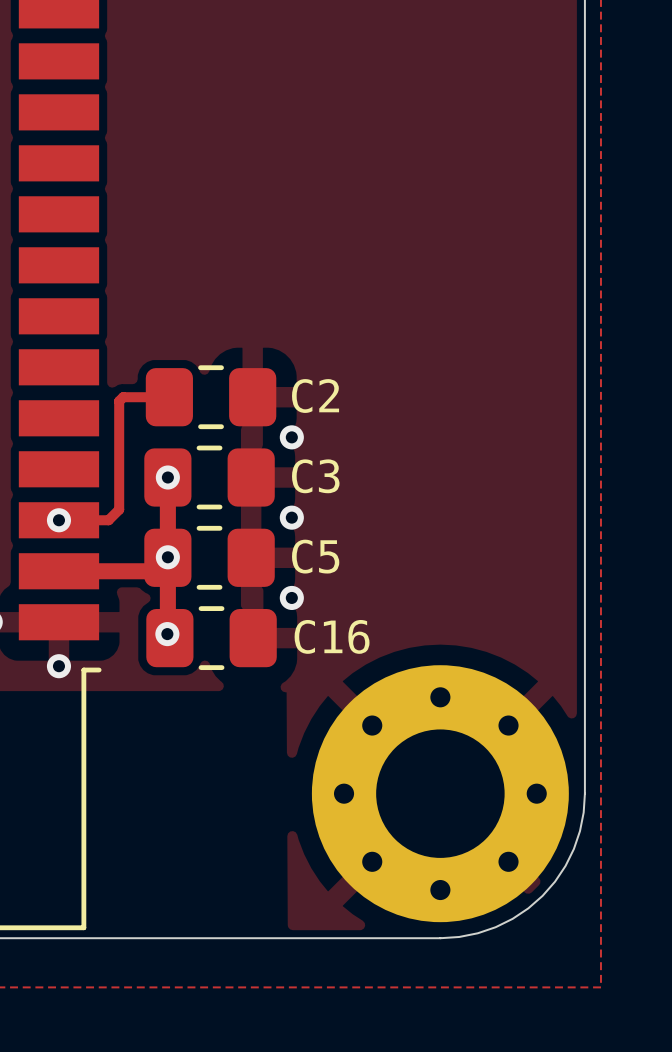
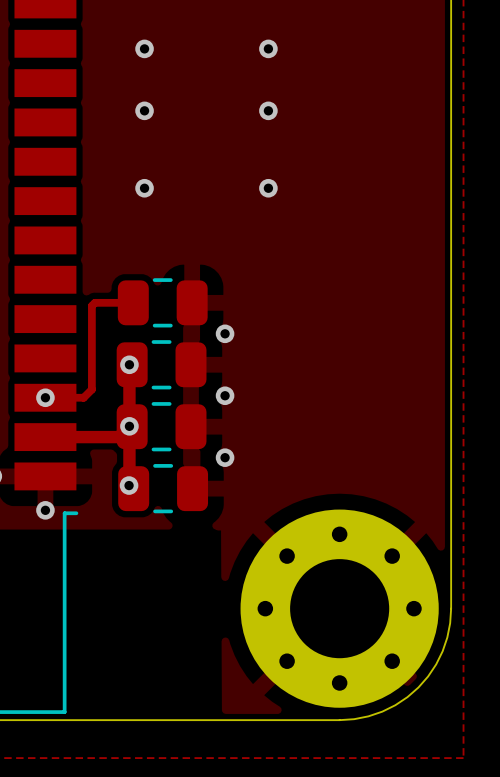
via: none -> (144, 48)
via: none -> (268, 48)
via: none -> (144, 110)
via: none -> (268, 110)
via: none -> (144, 188)
via: none -> (268, 188)
C2: (211, 397) -> none
part: none -> (162, 302)
C3: (209, 477) -> none
part: none -> (161, 364)
C5: (209, 557) -> none
part: none -> (161, 426)
C16: (211, 638) -> none
part: none -> (163, 488)

